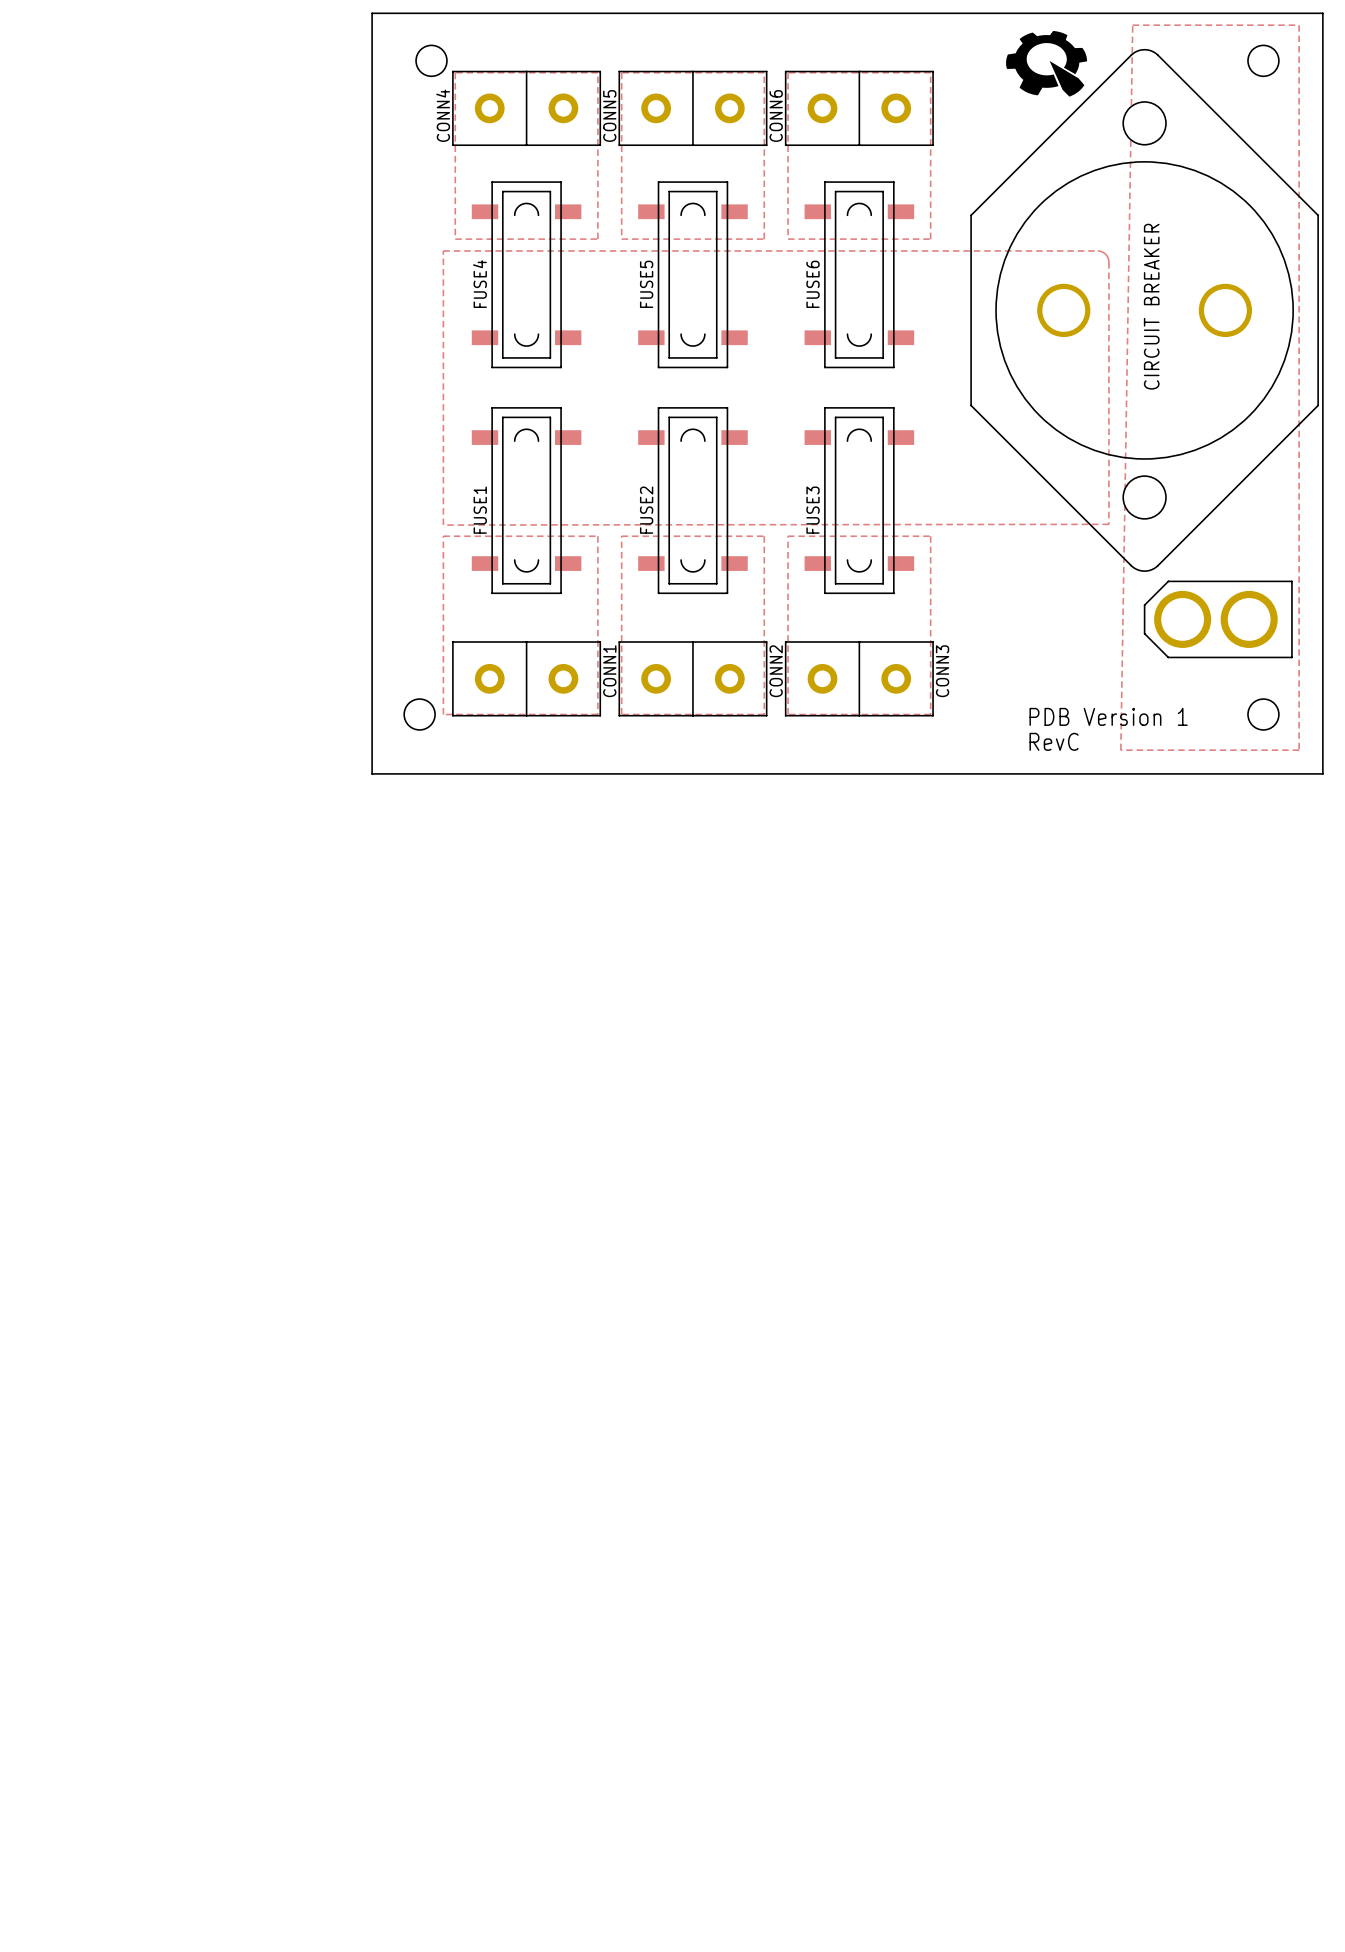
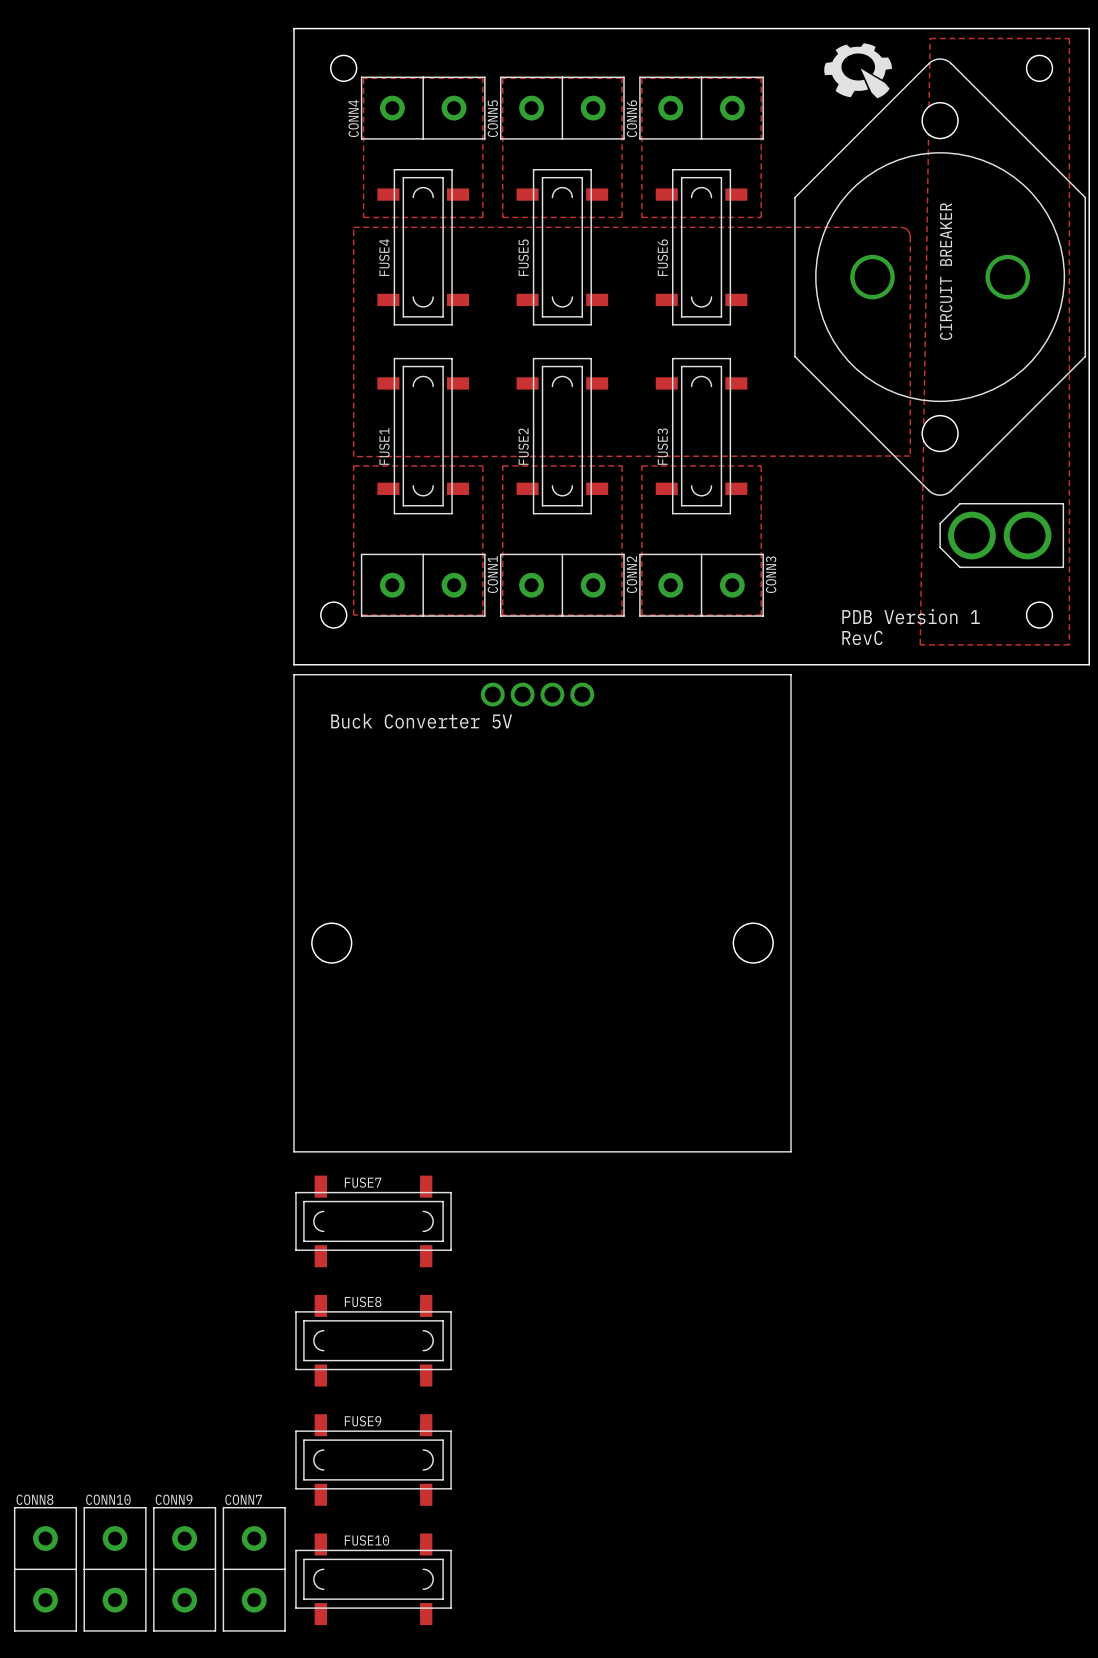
part: none -> (542, 913)
FUSE7: none -> (373, 1221)
FUSE8: none -> (373, 1340)
FUSE9: none -> (373, 1459)
CONN8: none -> (45, 1569)
CONN10: none -> (115, 1569)
CONN9: none -> (184, 1569)
CONN7: none -> (254, 1569)
FUSE10: none -> (373, 1579)

